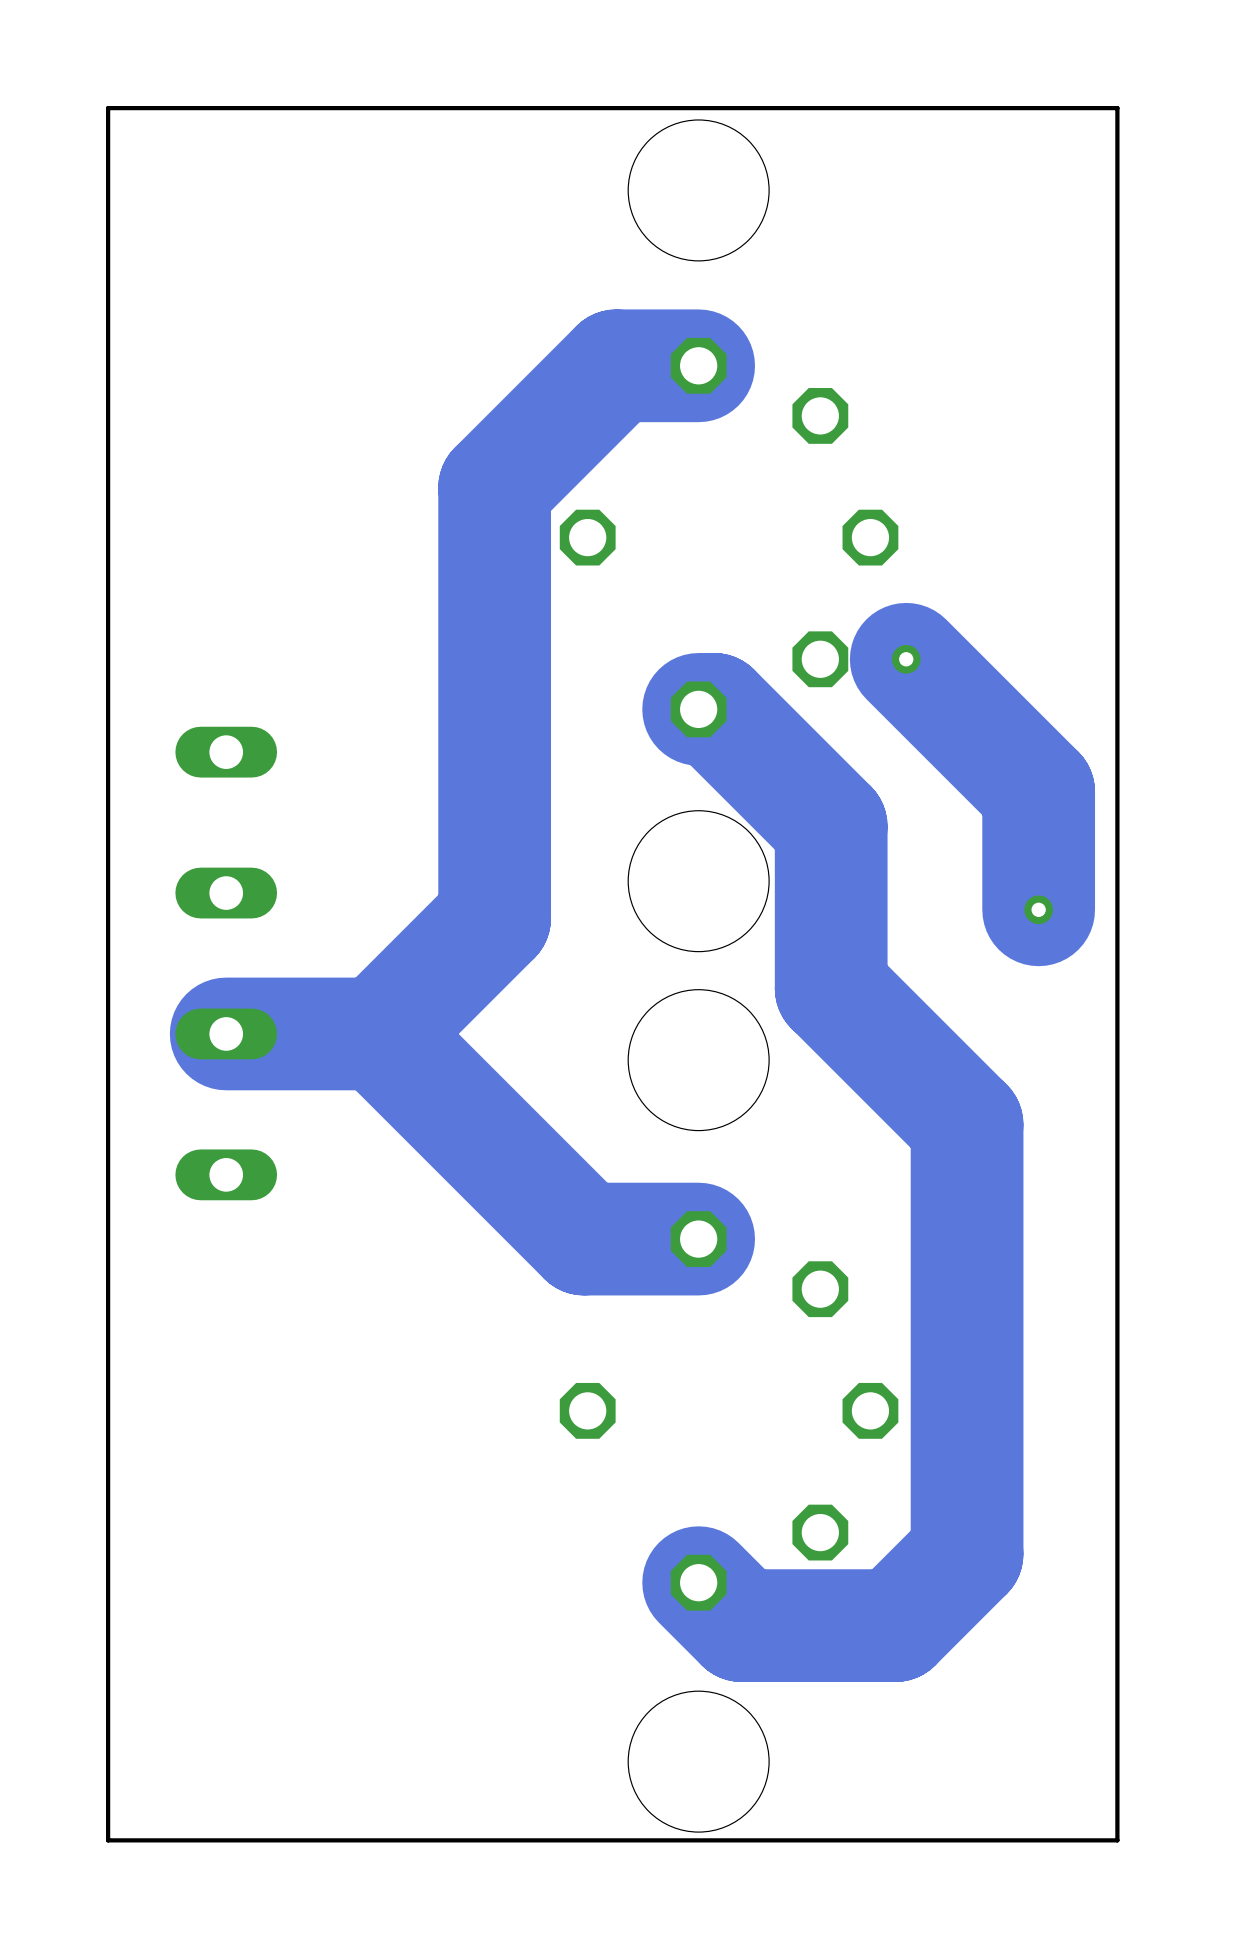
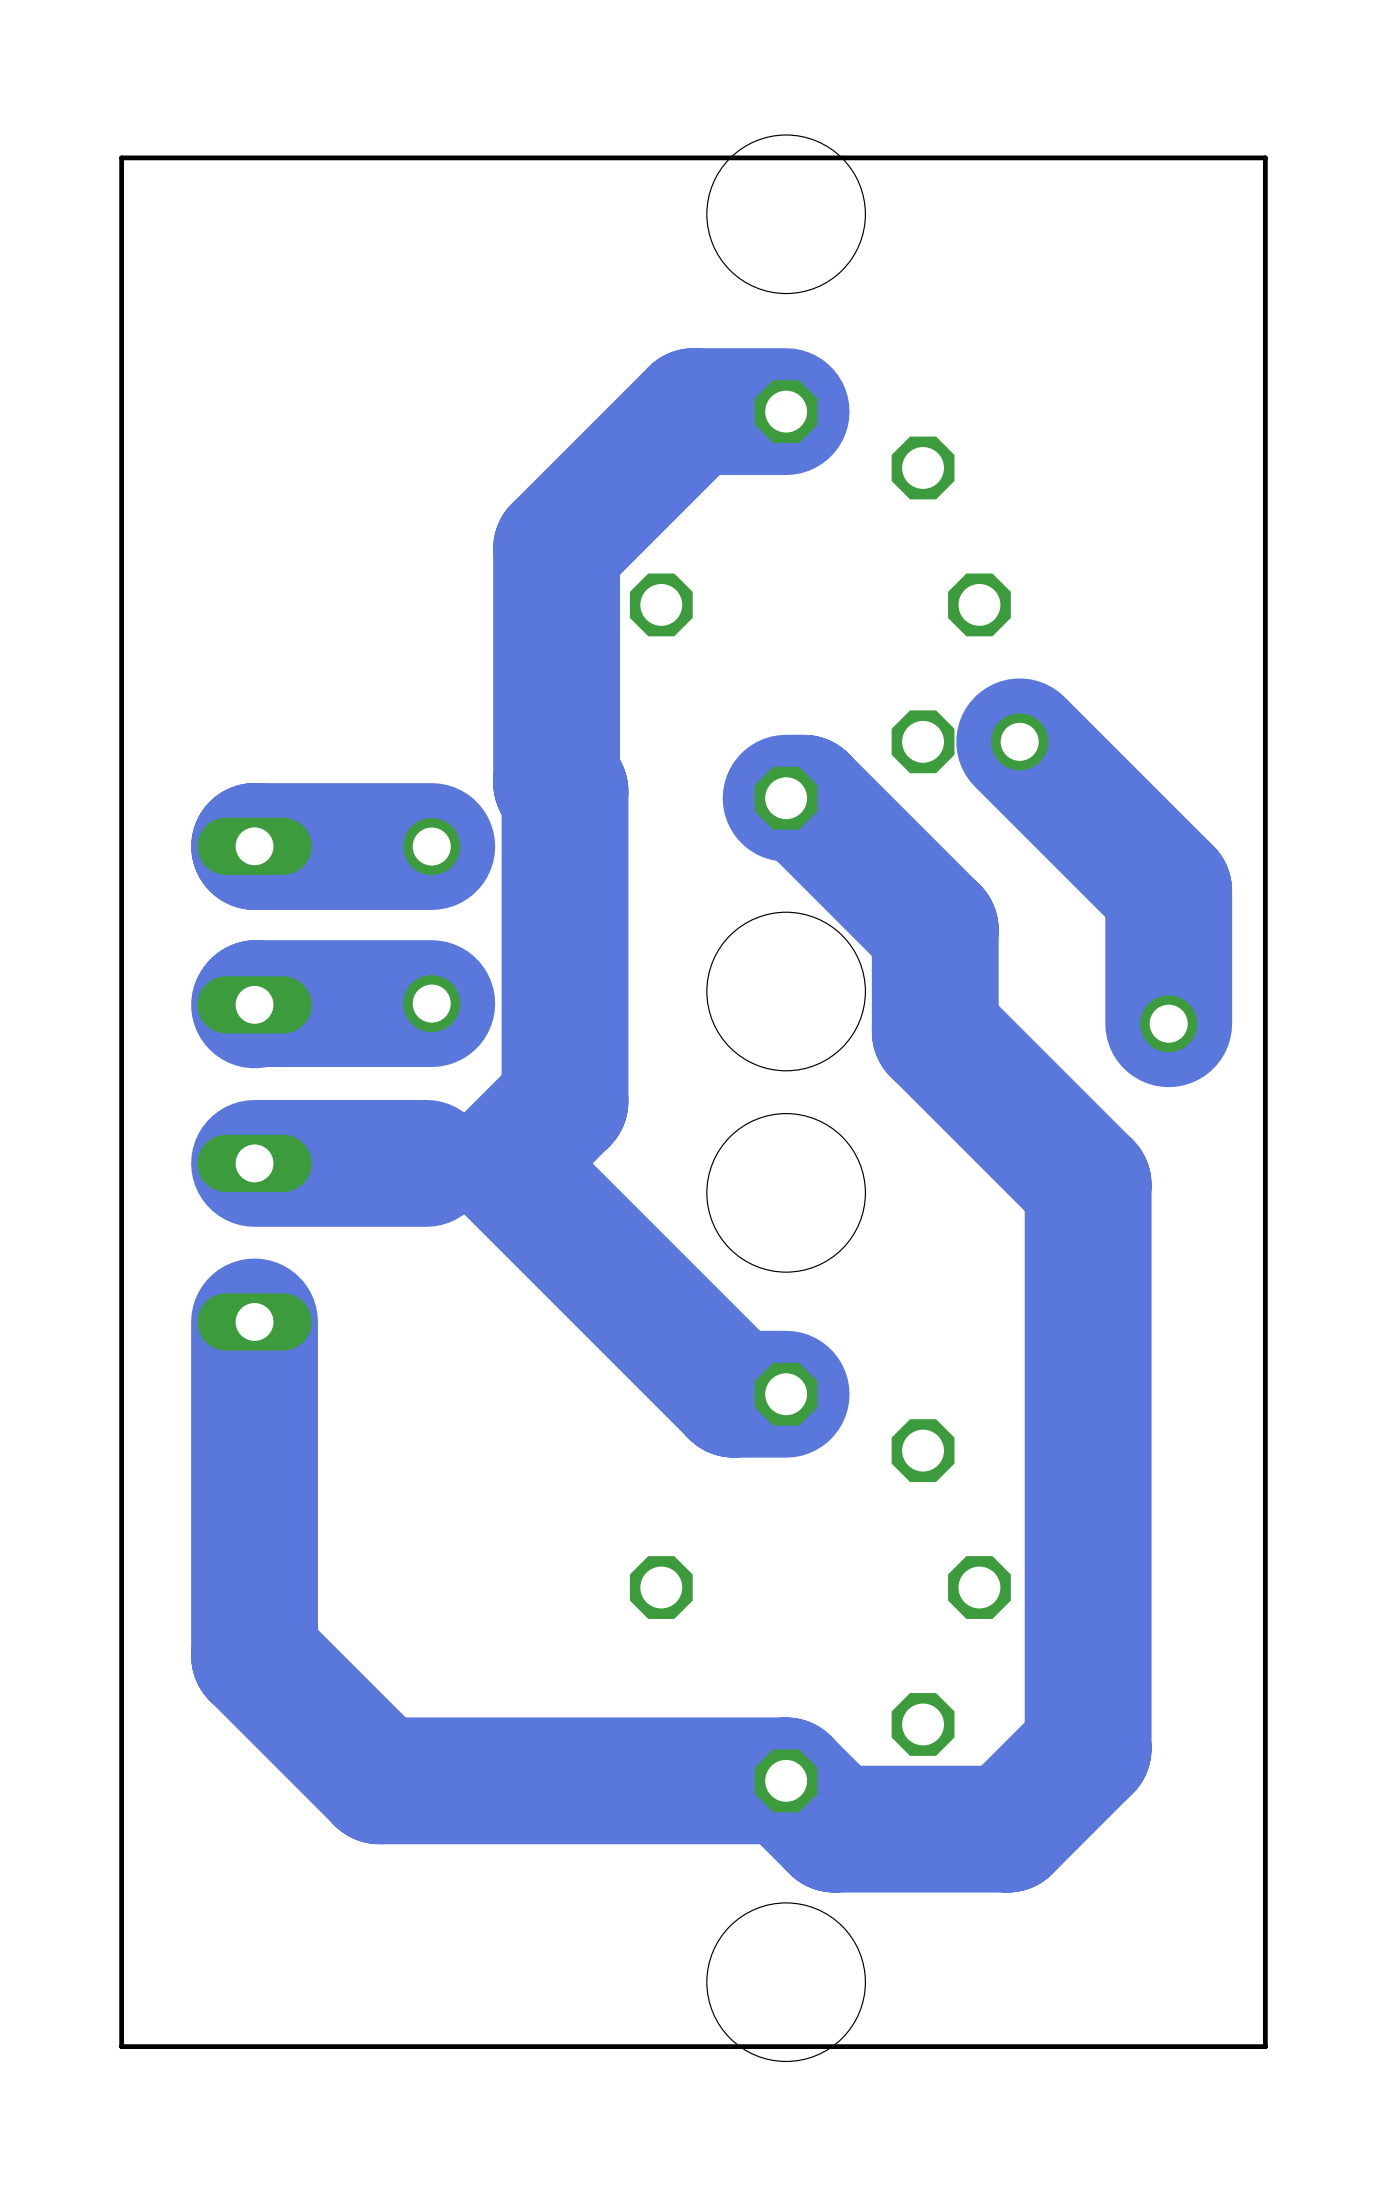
board edge: (108, 140) (108, 108) (1117, 108) (1117, 1840) (108, 1840) (108, 1818) -> (121, 157) (1265, 157) (1265, 2046) (121, 2046)
via size: [891, 644, 921, 674] -> [991, 713, 1049, 771]
track: (494, 695) (494, 918) (378, 1033) (584, 1239) (652, 1239) -> (556, 782) (565, 791) (565, 1101) (502, 1163) (733, 1394)
track: none -> (431, 846) (254, 846)
via: none -> (431, 846)
track: none -> (431, 1003) (254, 1004)
via: none -> (431, 1003)
via size: [1024, 895, 1053, 925] -> [1140, 995, 1198, 1053]
track: (831, 917) (831, 988) (967, 1124) -> (935, 1031) (1088, 1184) (1088, 1265)
track: none -> (254, 1321) (254, 1655) (379, 1780) (786, 1780)

